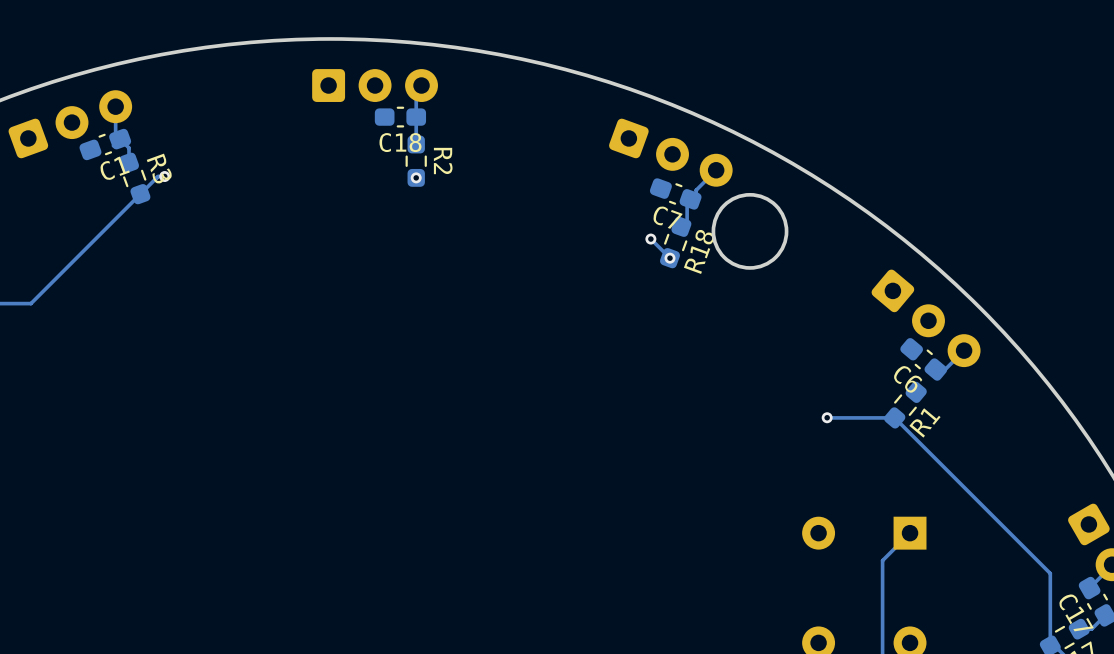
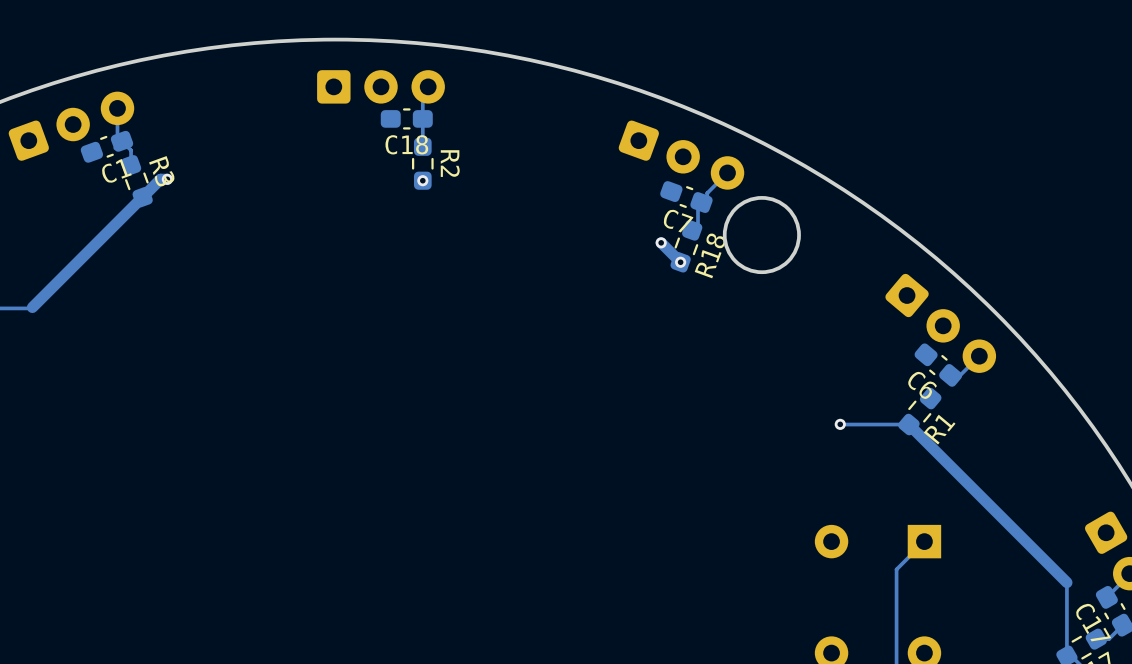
track width: thin (164, 176) (158, 176) (31, 302) -> thick (167, 179) (160, 179) (32, 307)
track width: thin (650, 239) (669, 258) -> thick (661, 242) (680, 262)
track width: thin (894, 417) (1050, 573) -> thick (908, 424) (1066, 582)

